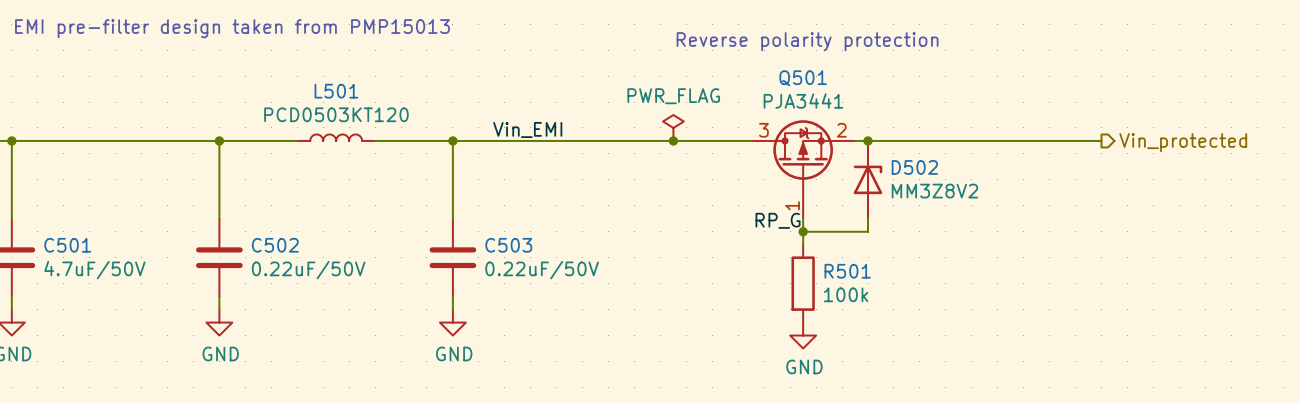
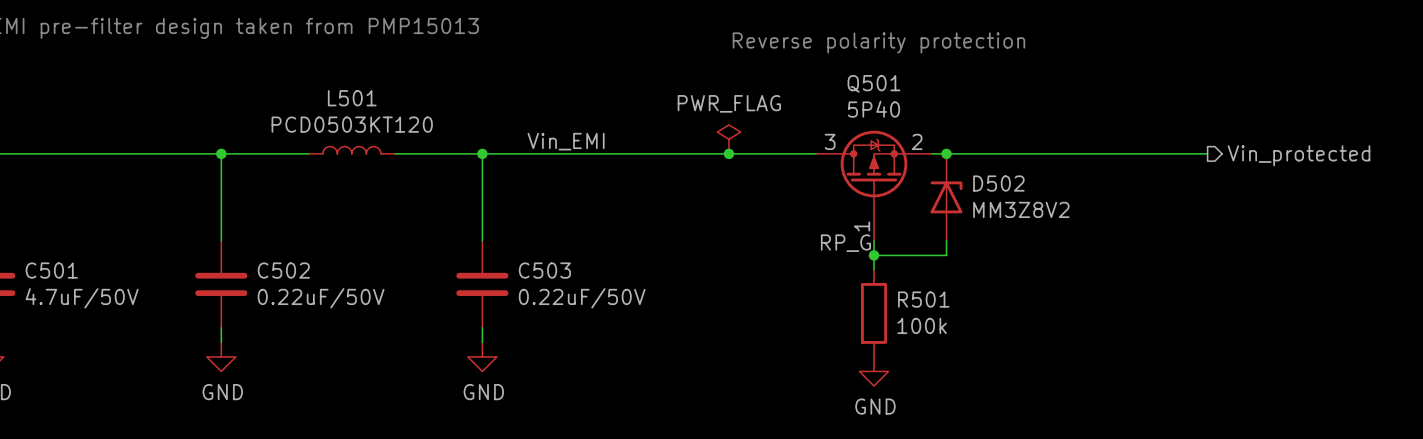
Q501 value: PJA3441 (803, 100) -> 5P40 (874, 109)

